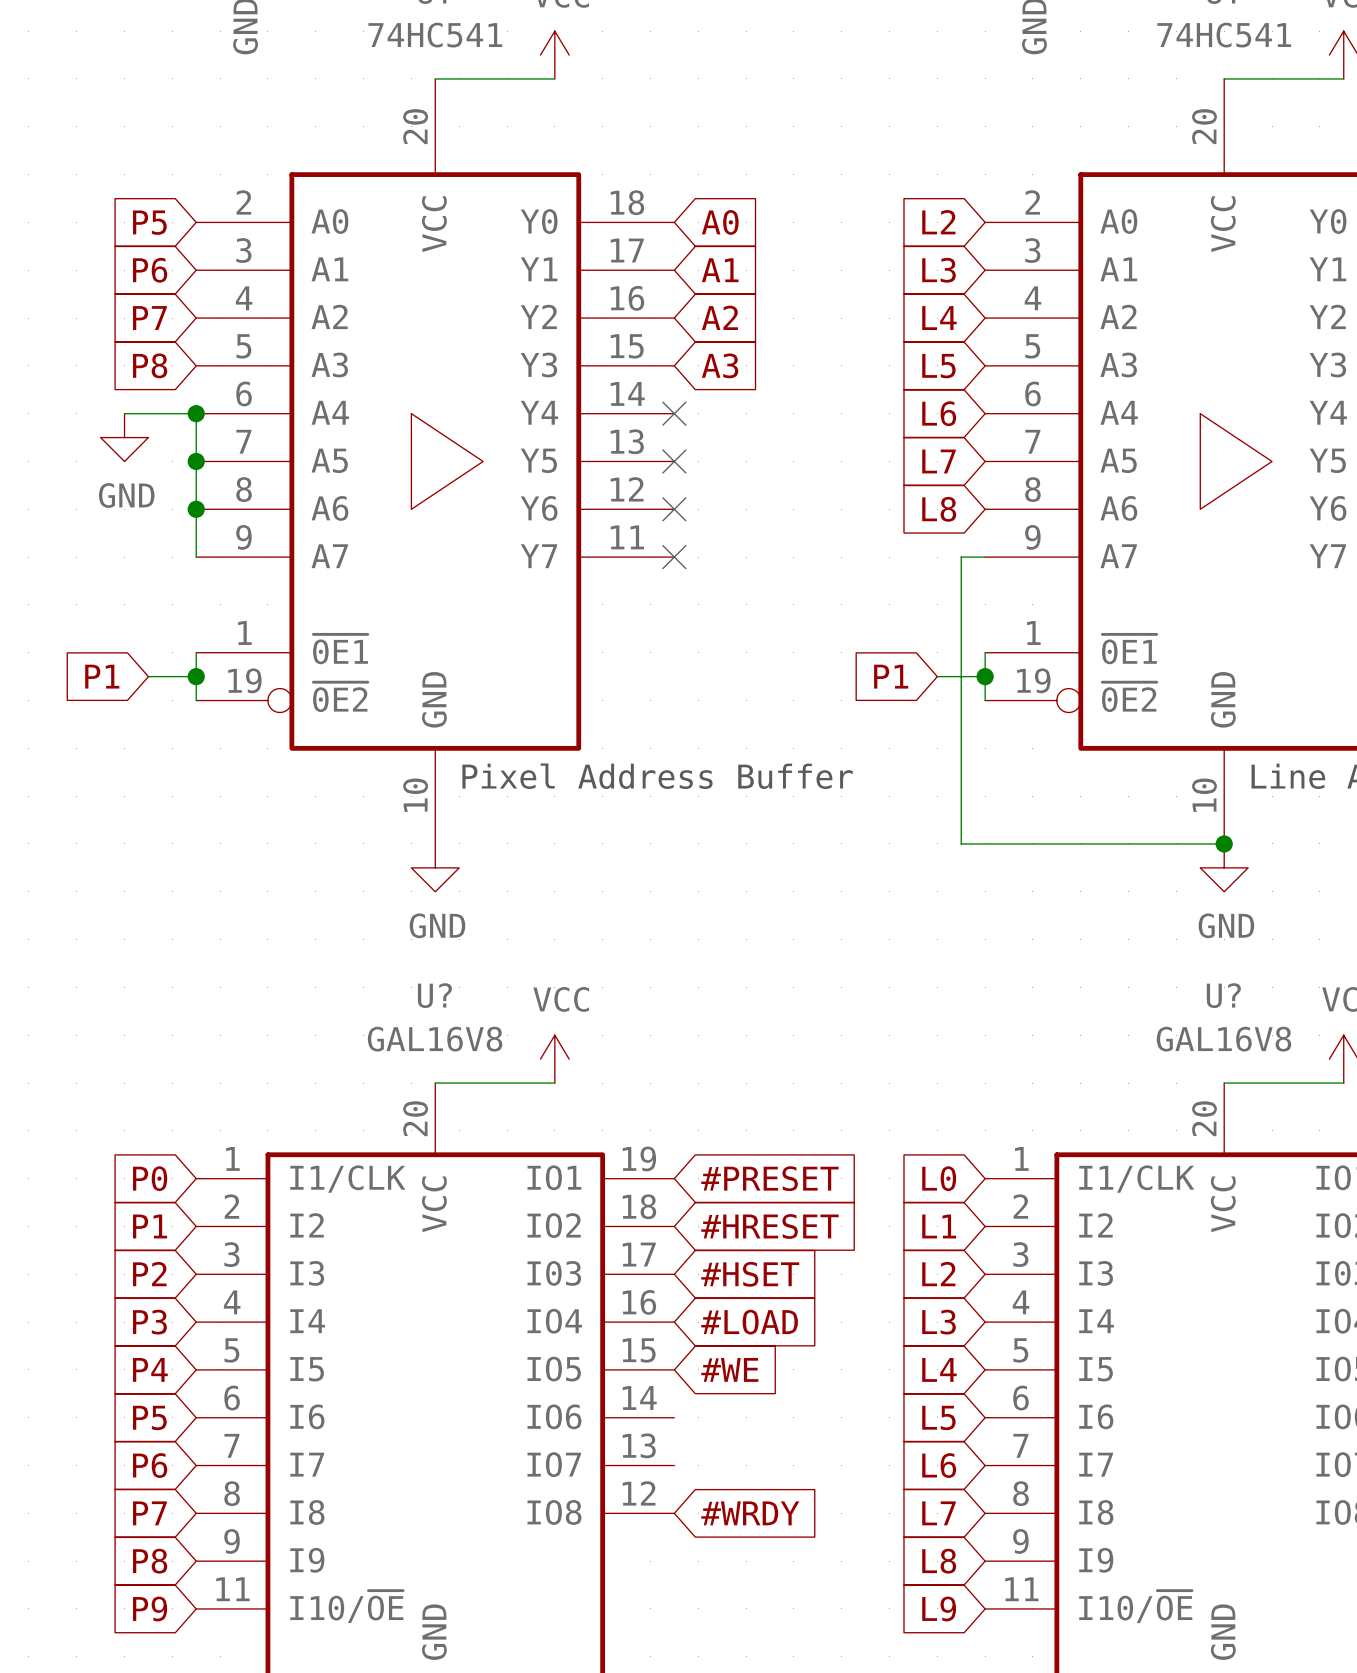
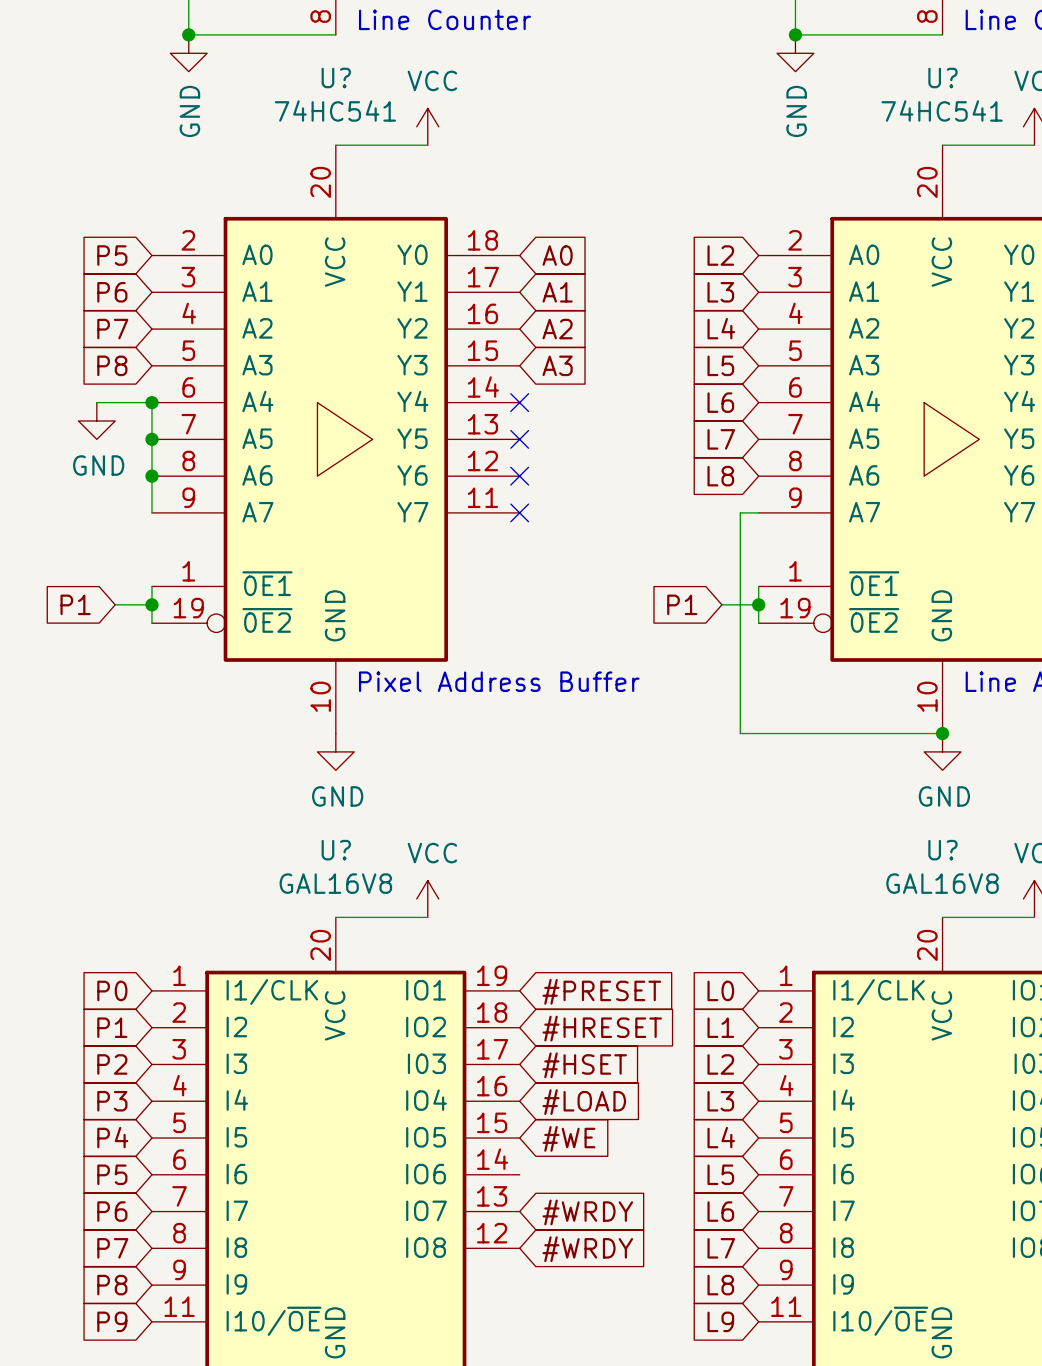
global label: none -> #WRDY (587, 1212)

